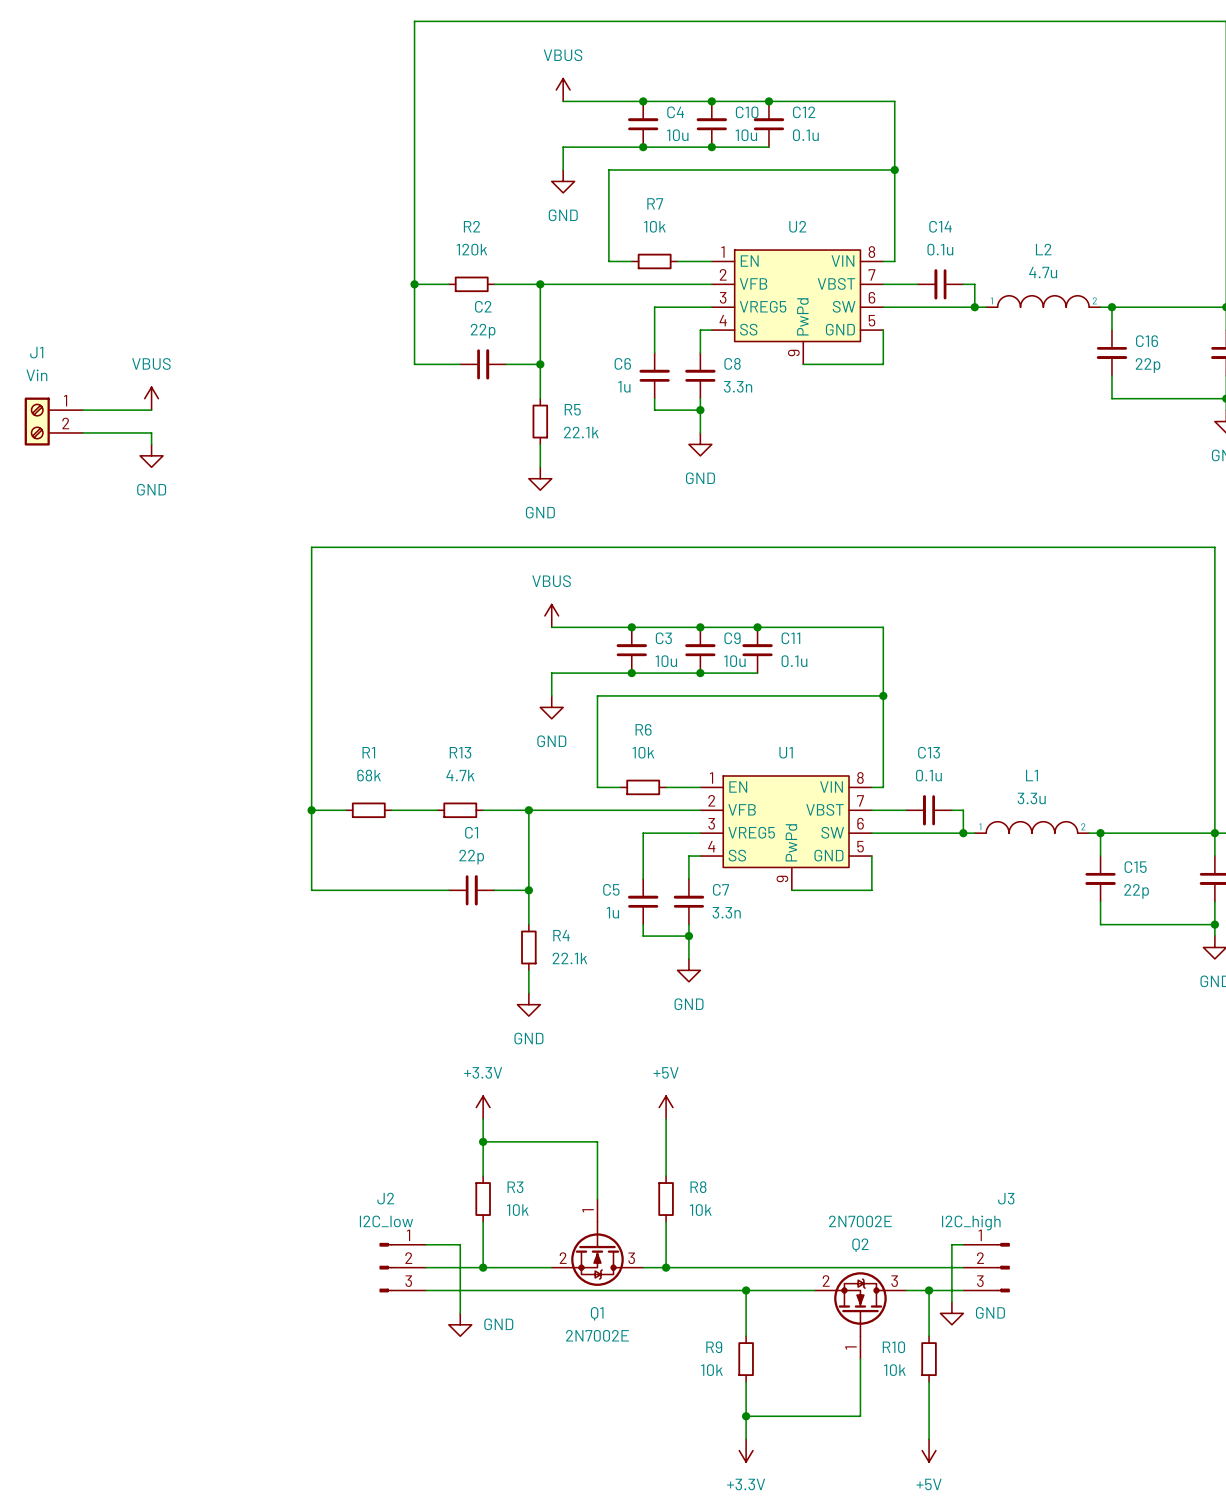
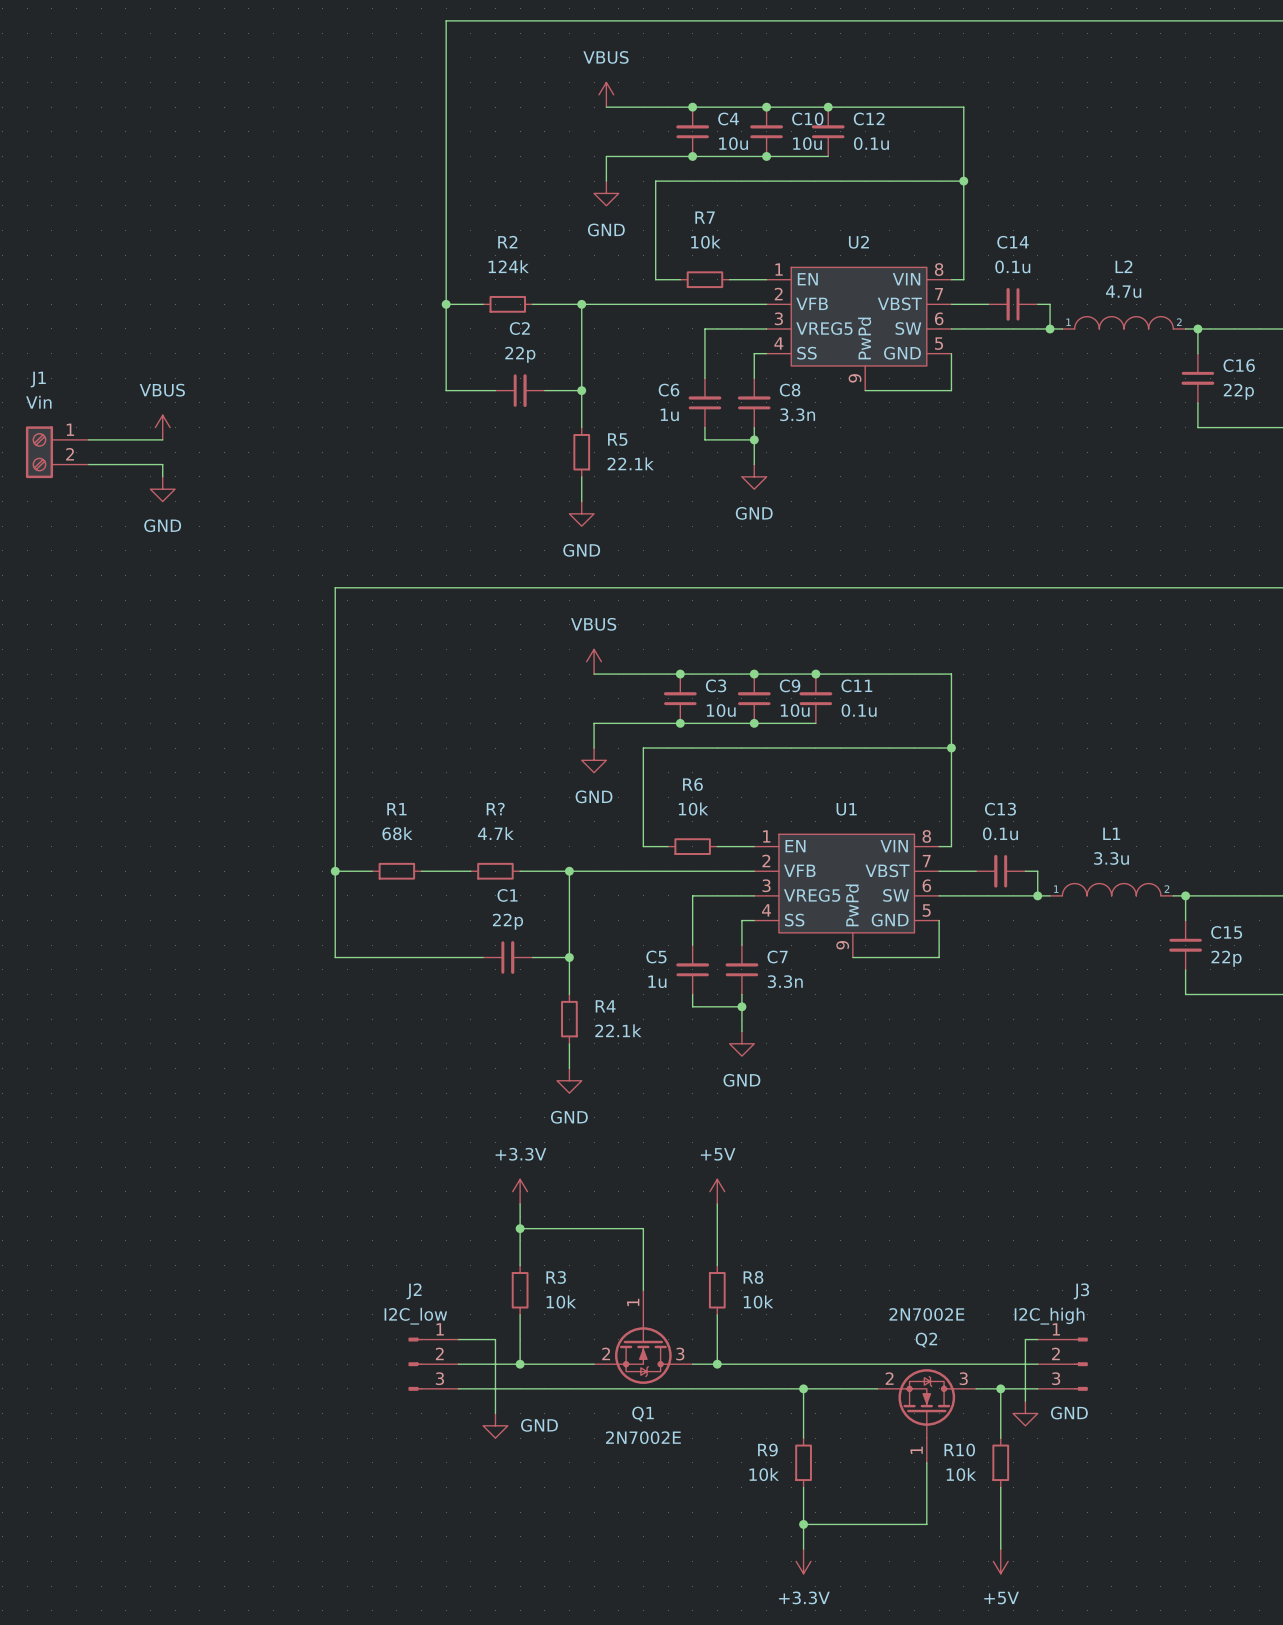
R2 value: 120k (471, 249) -> 124k (508, 266)
R13 name: R13 (460, 752) -> R? (495, 809)

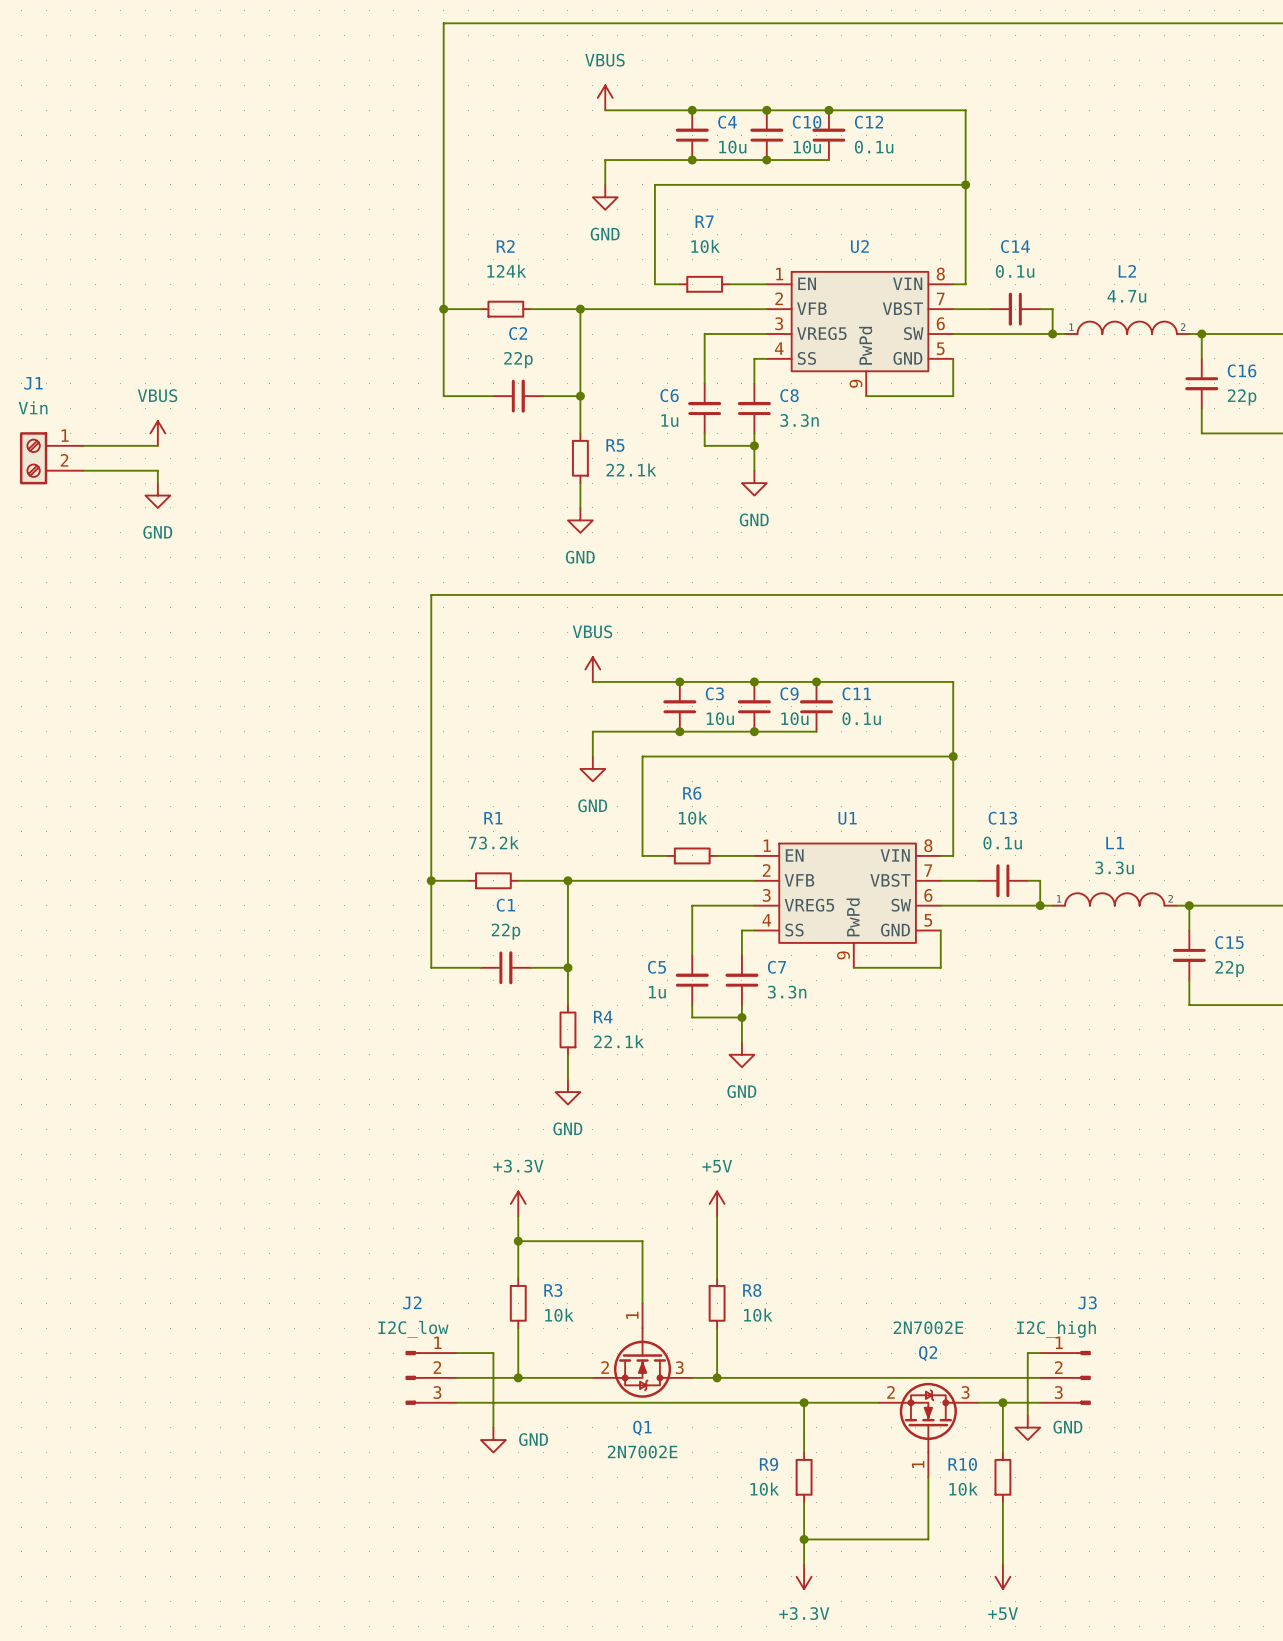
wire: (433, 587) (335, 587) (335, 957) (433, 957) -> (431, 594) (431, 967)
R? name: R? (495, 809) -> R1 (493, 818)
R? value: 4.7k (495, 833) -> 73.2k (493, 842)
wire: (335, 871) (372, 871) -> none
junction: (335, 871) -> none
R1: 68k (396, 871) -> none
wire: (421, 871) (433, 871) -> none
junction: none -> (431, 880)

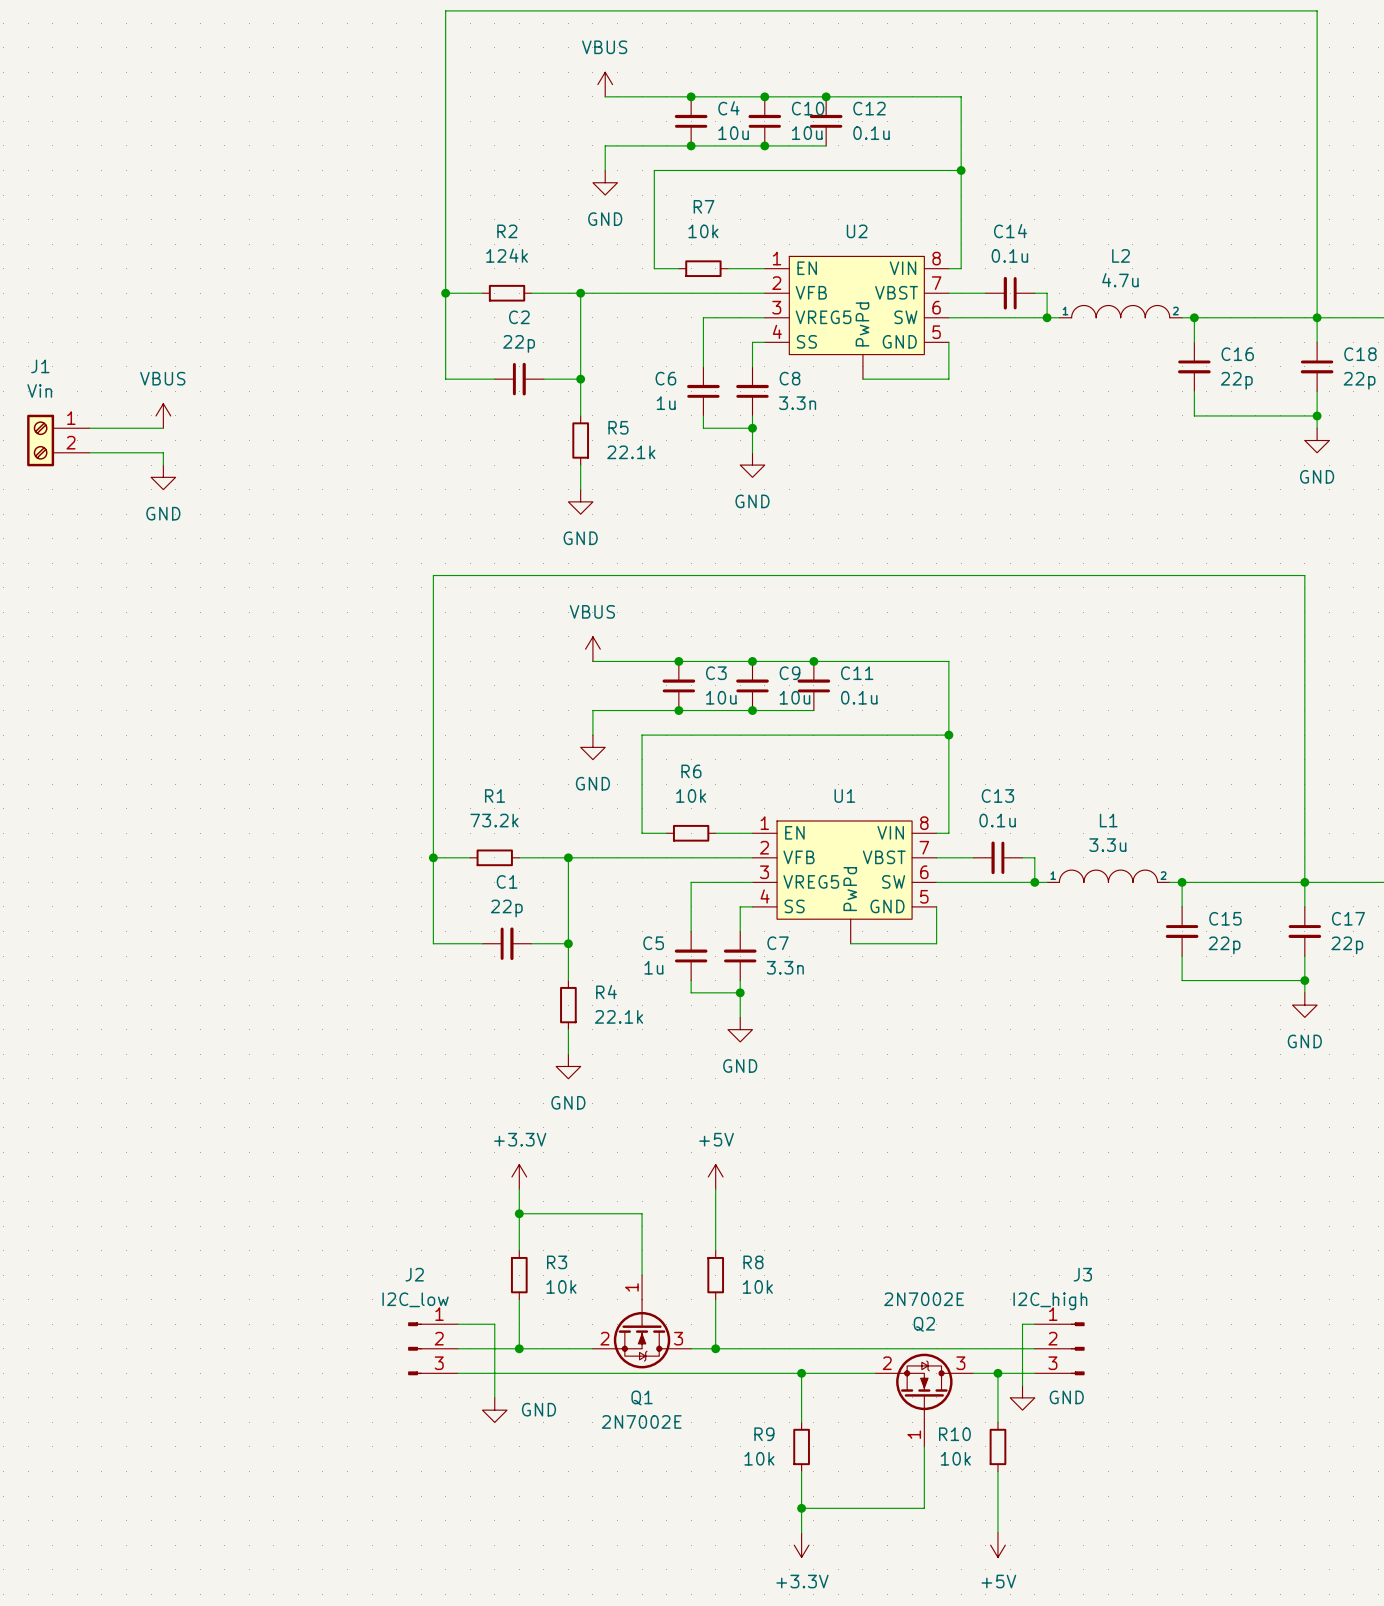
U2 pin number: 9 (855, 383) -> none
U1 pin number: 9 (843, 955) -> none

